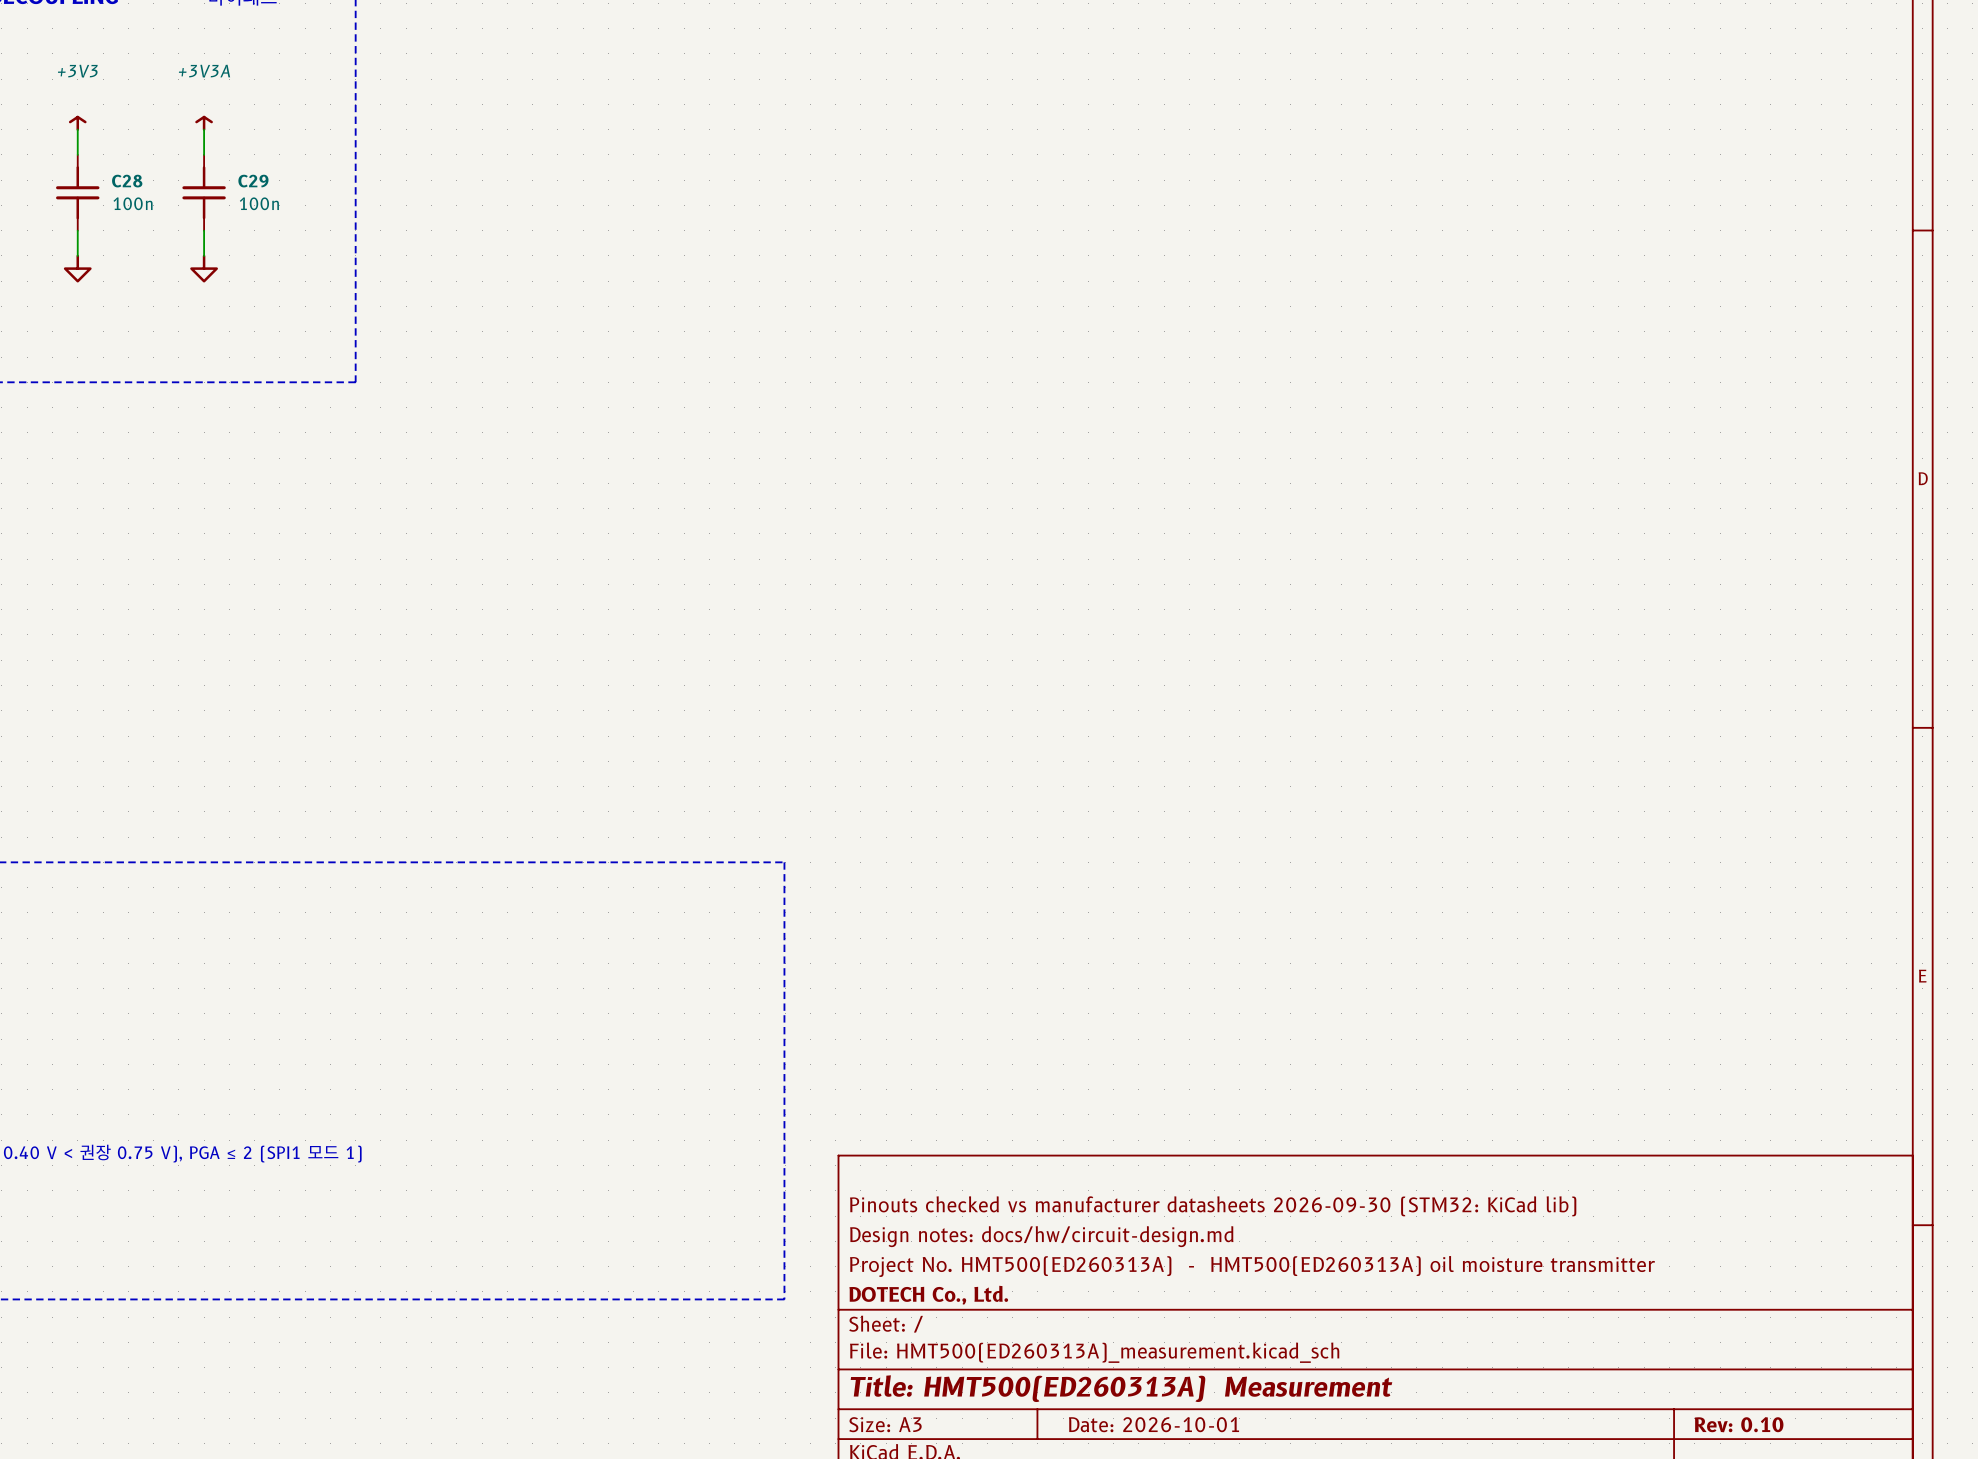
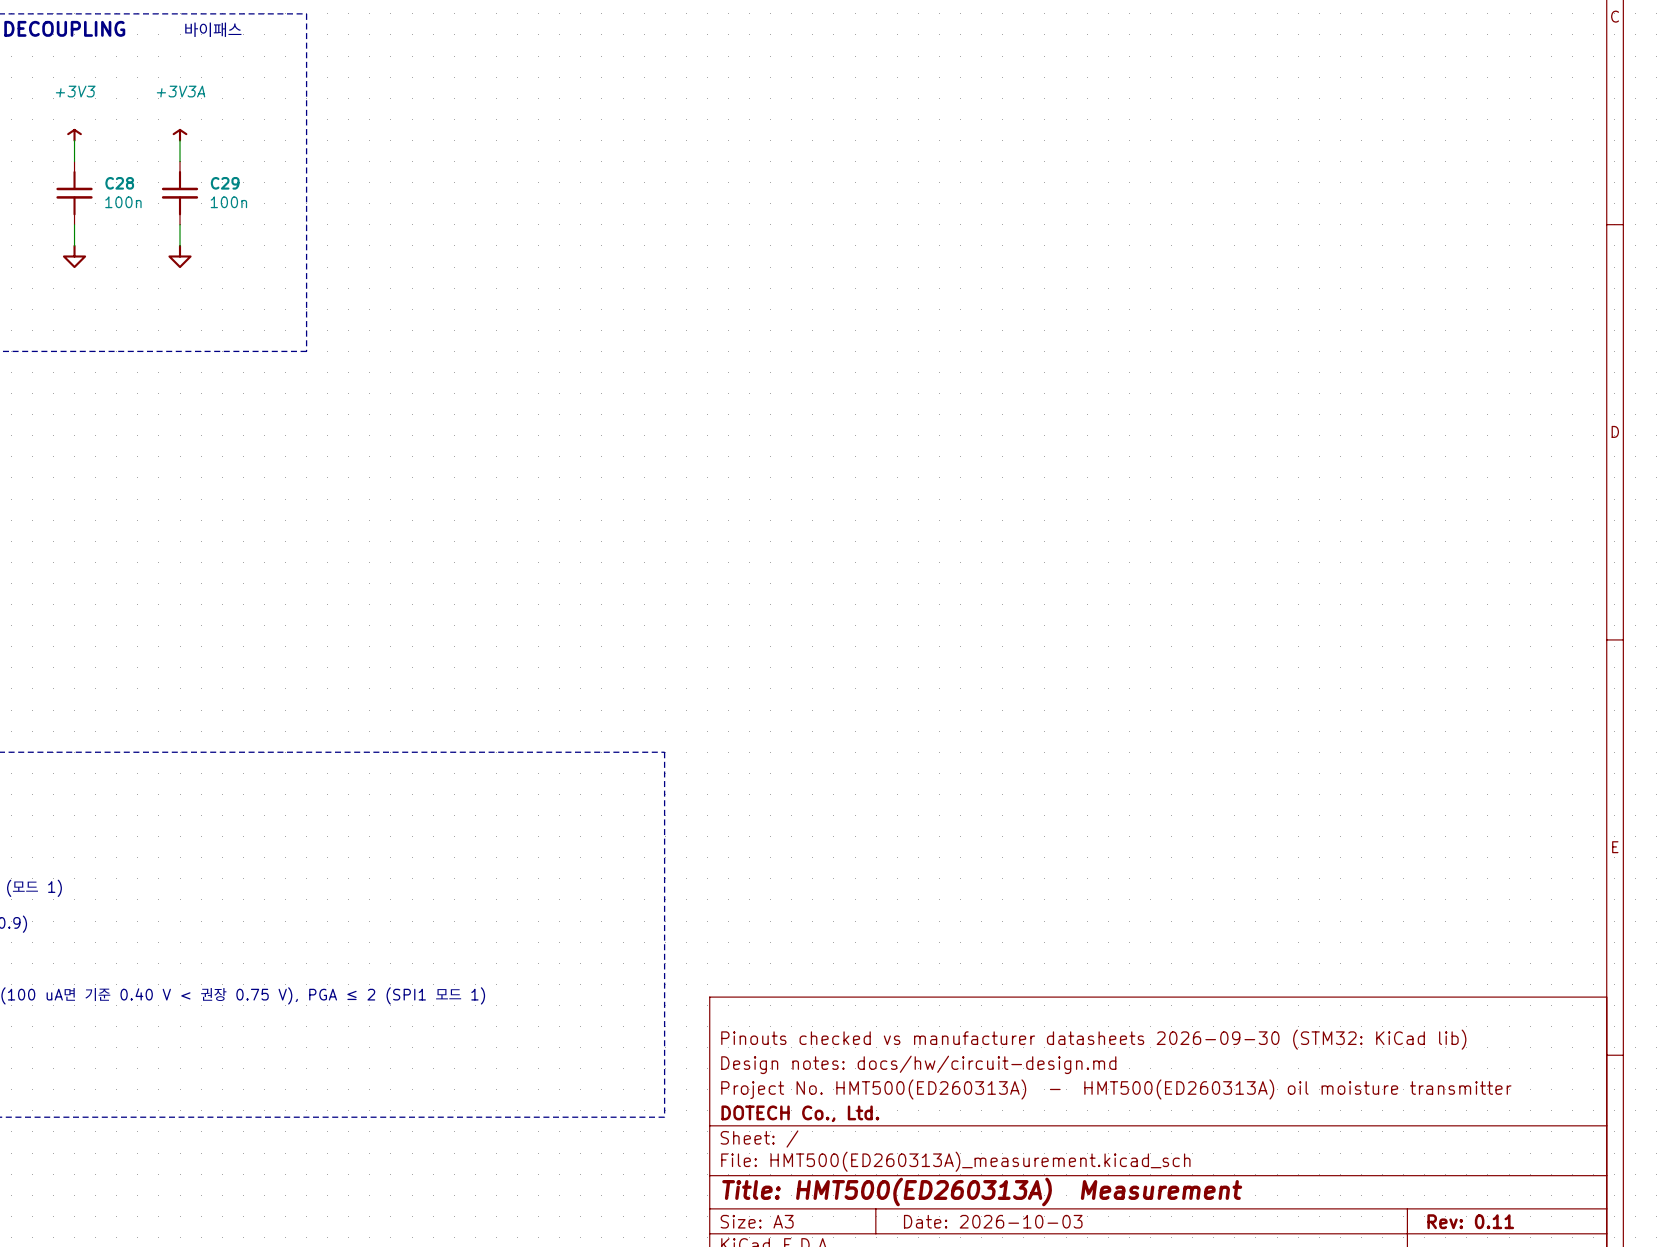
title block: Date: 2026-10-01 (1154, 1424) -> Date: 2026-10-03 (993, 1221)
title block: Rev: 0.10 (1739, 1424) -> Rev: 0.11 (1470, 1221)

